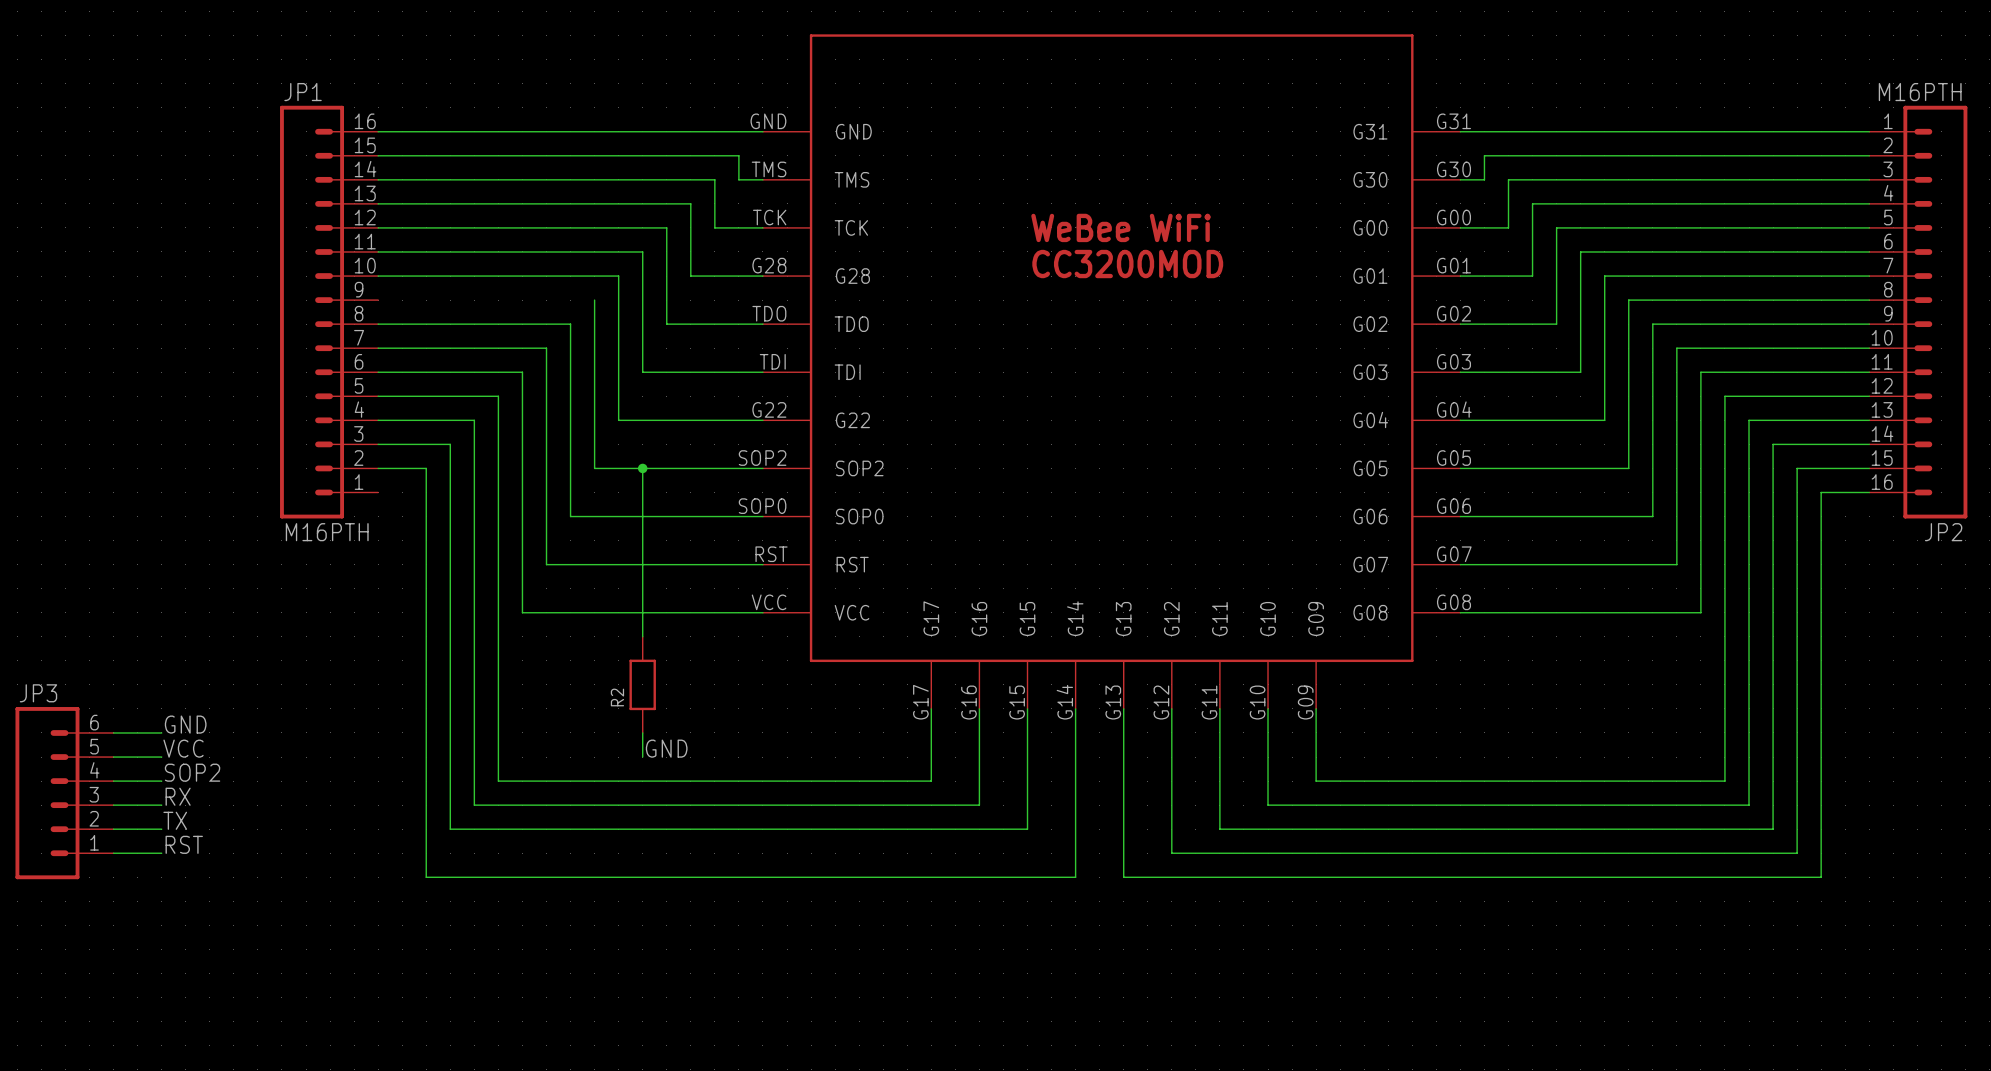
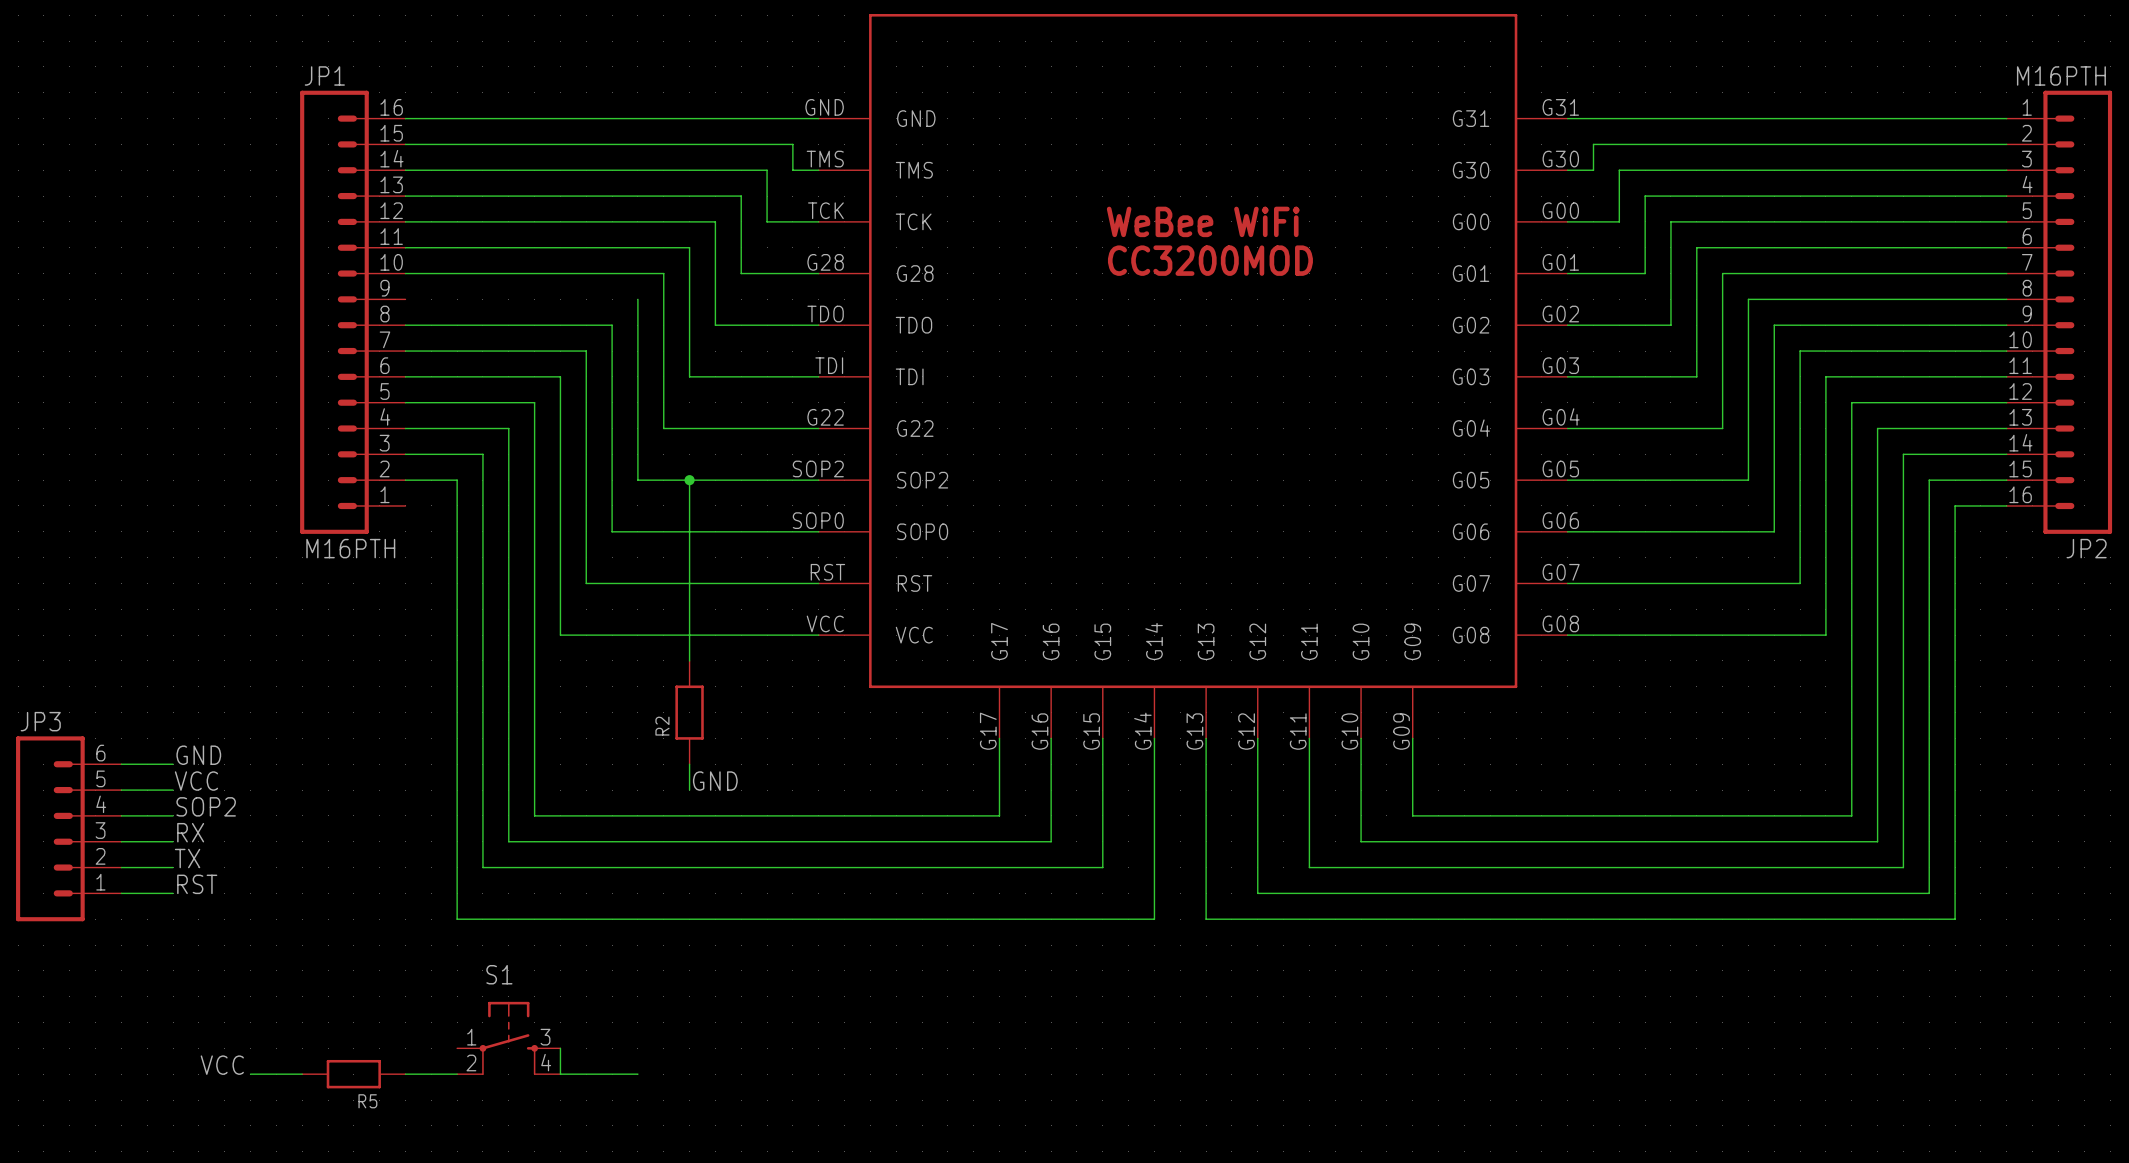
S1: none -> (508, 1038)
wire: none -> (560, 1048) (560, 1074) (637, 1074)
label: none -> VCC (222, 1065)
wire: none -> (250, 1074) (302, 1074)
R5: none -> (353, 1074)
wire: none -> (405, 1074) (457, 1074)

